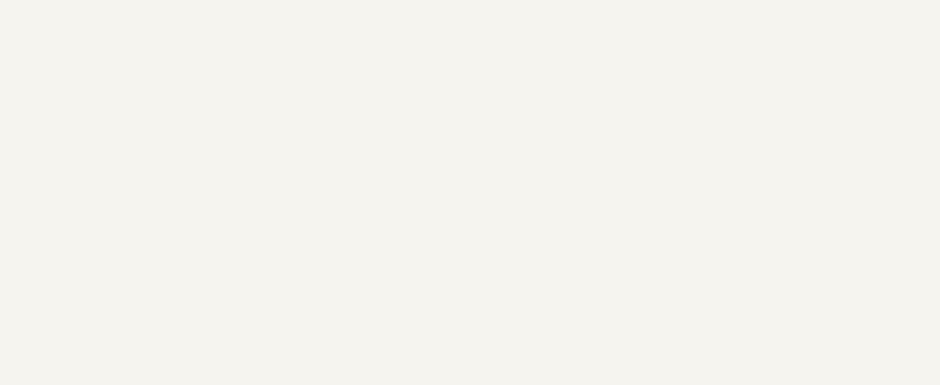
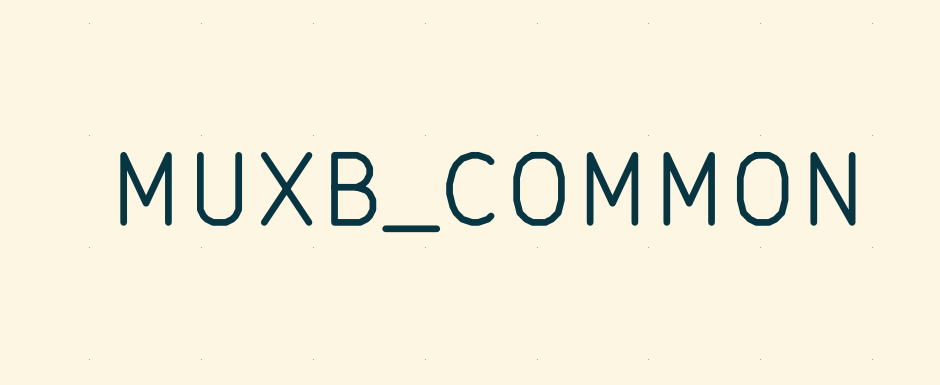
label: none -> MUXB_COMMON (487, 192)

